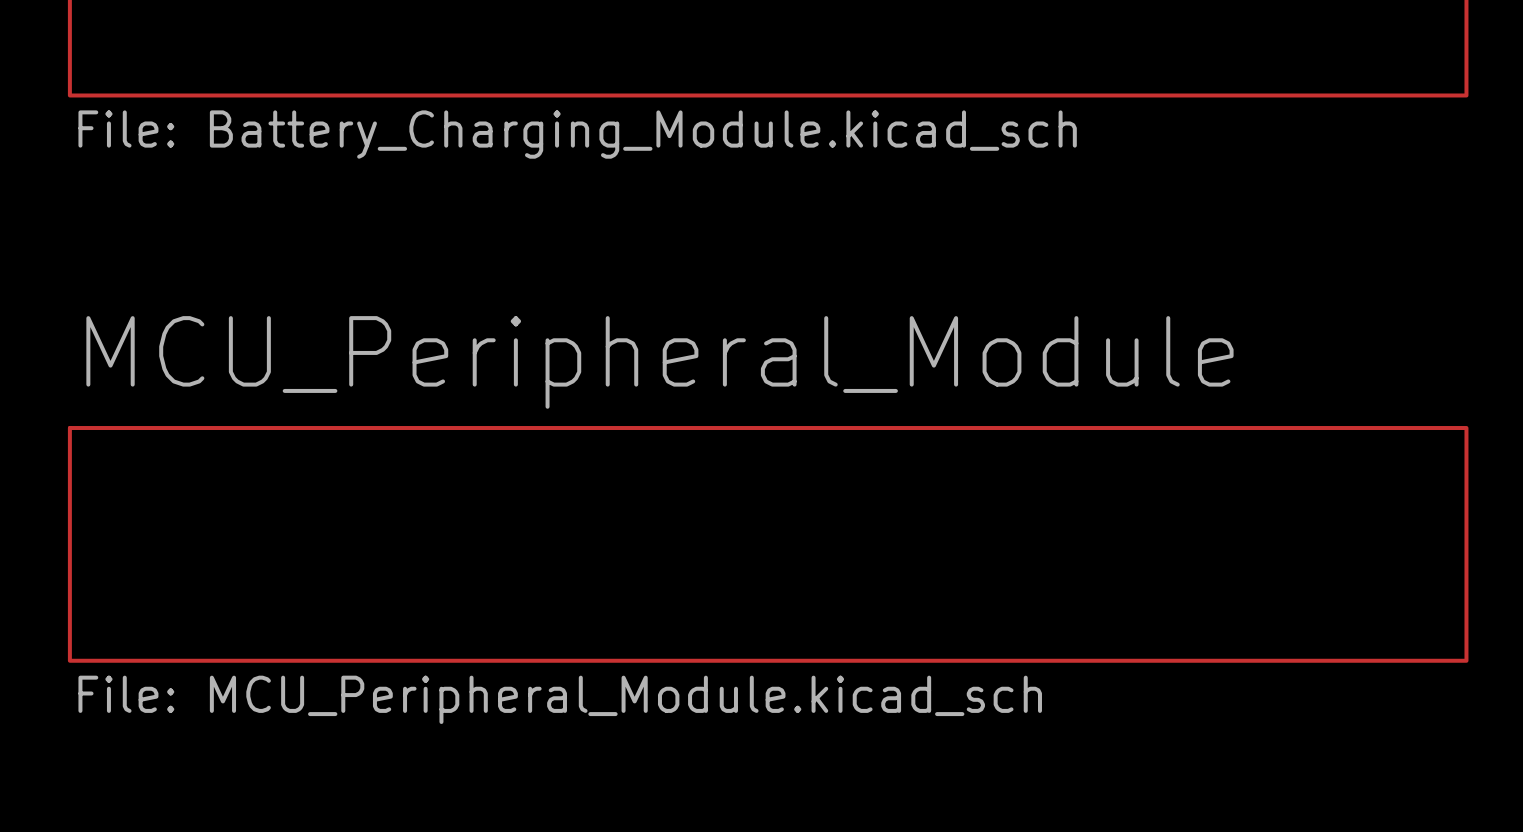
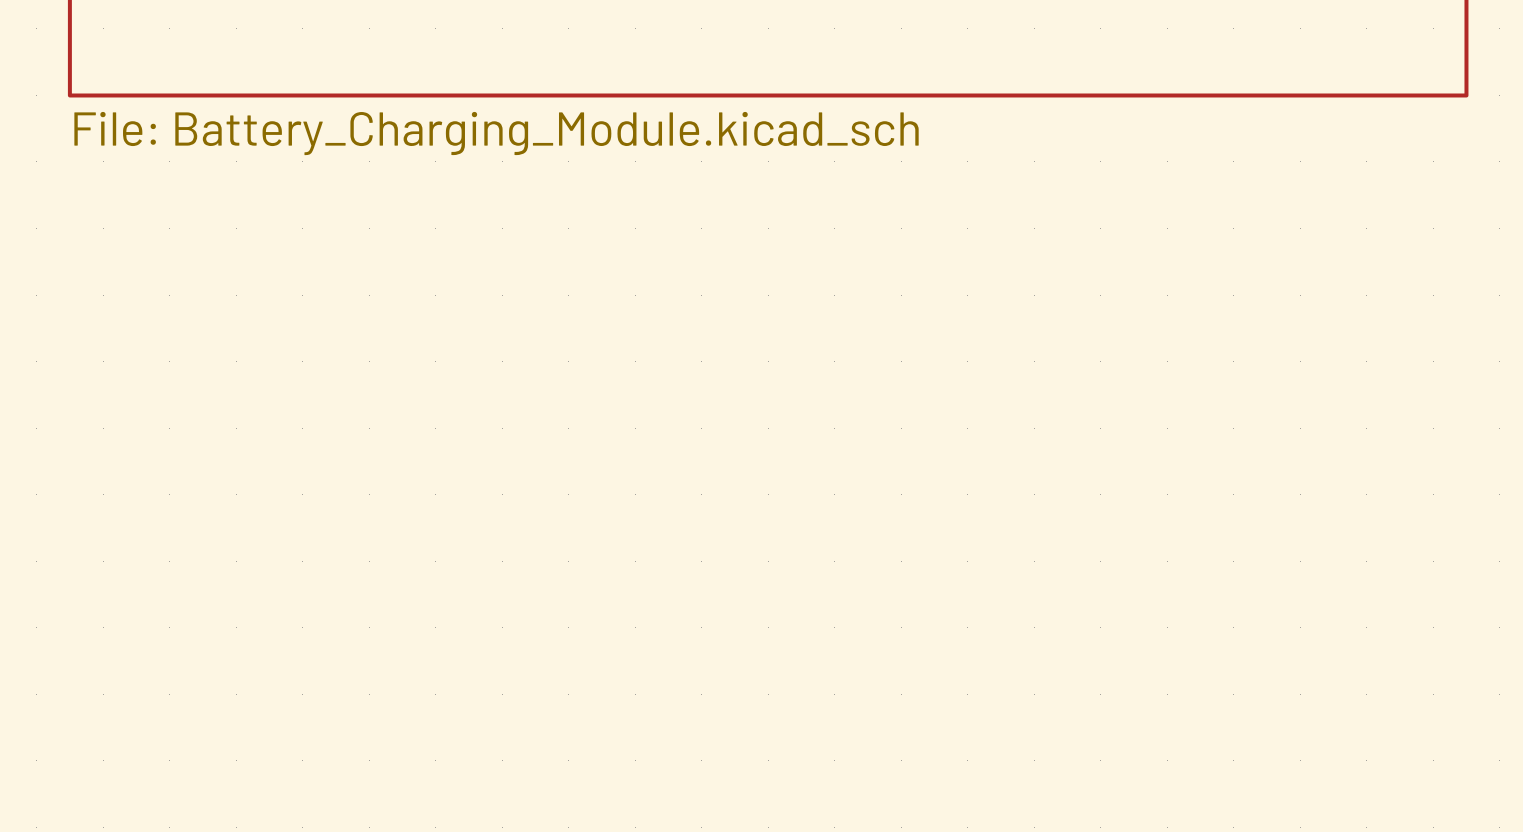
sheet MCU_Peripheral_Module: File: MCU_Peripheral_Module.kicad_sch (768, 544) -> none

